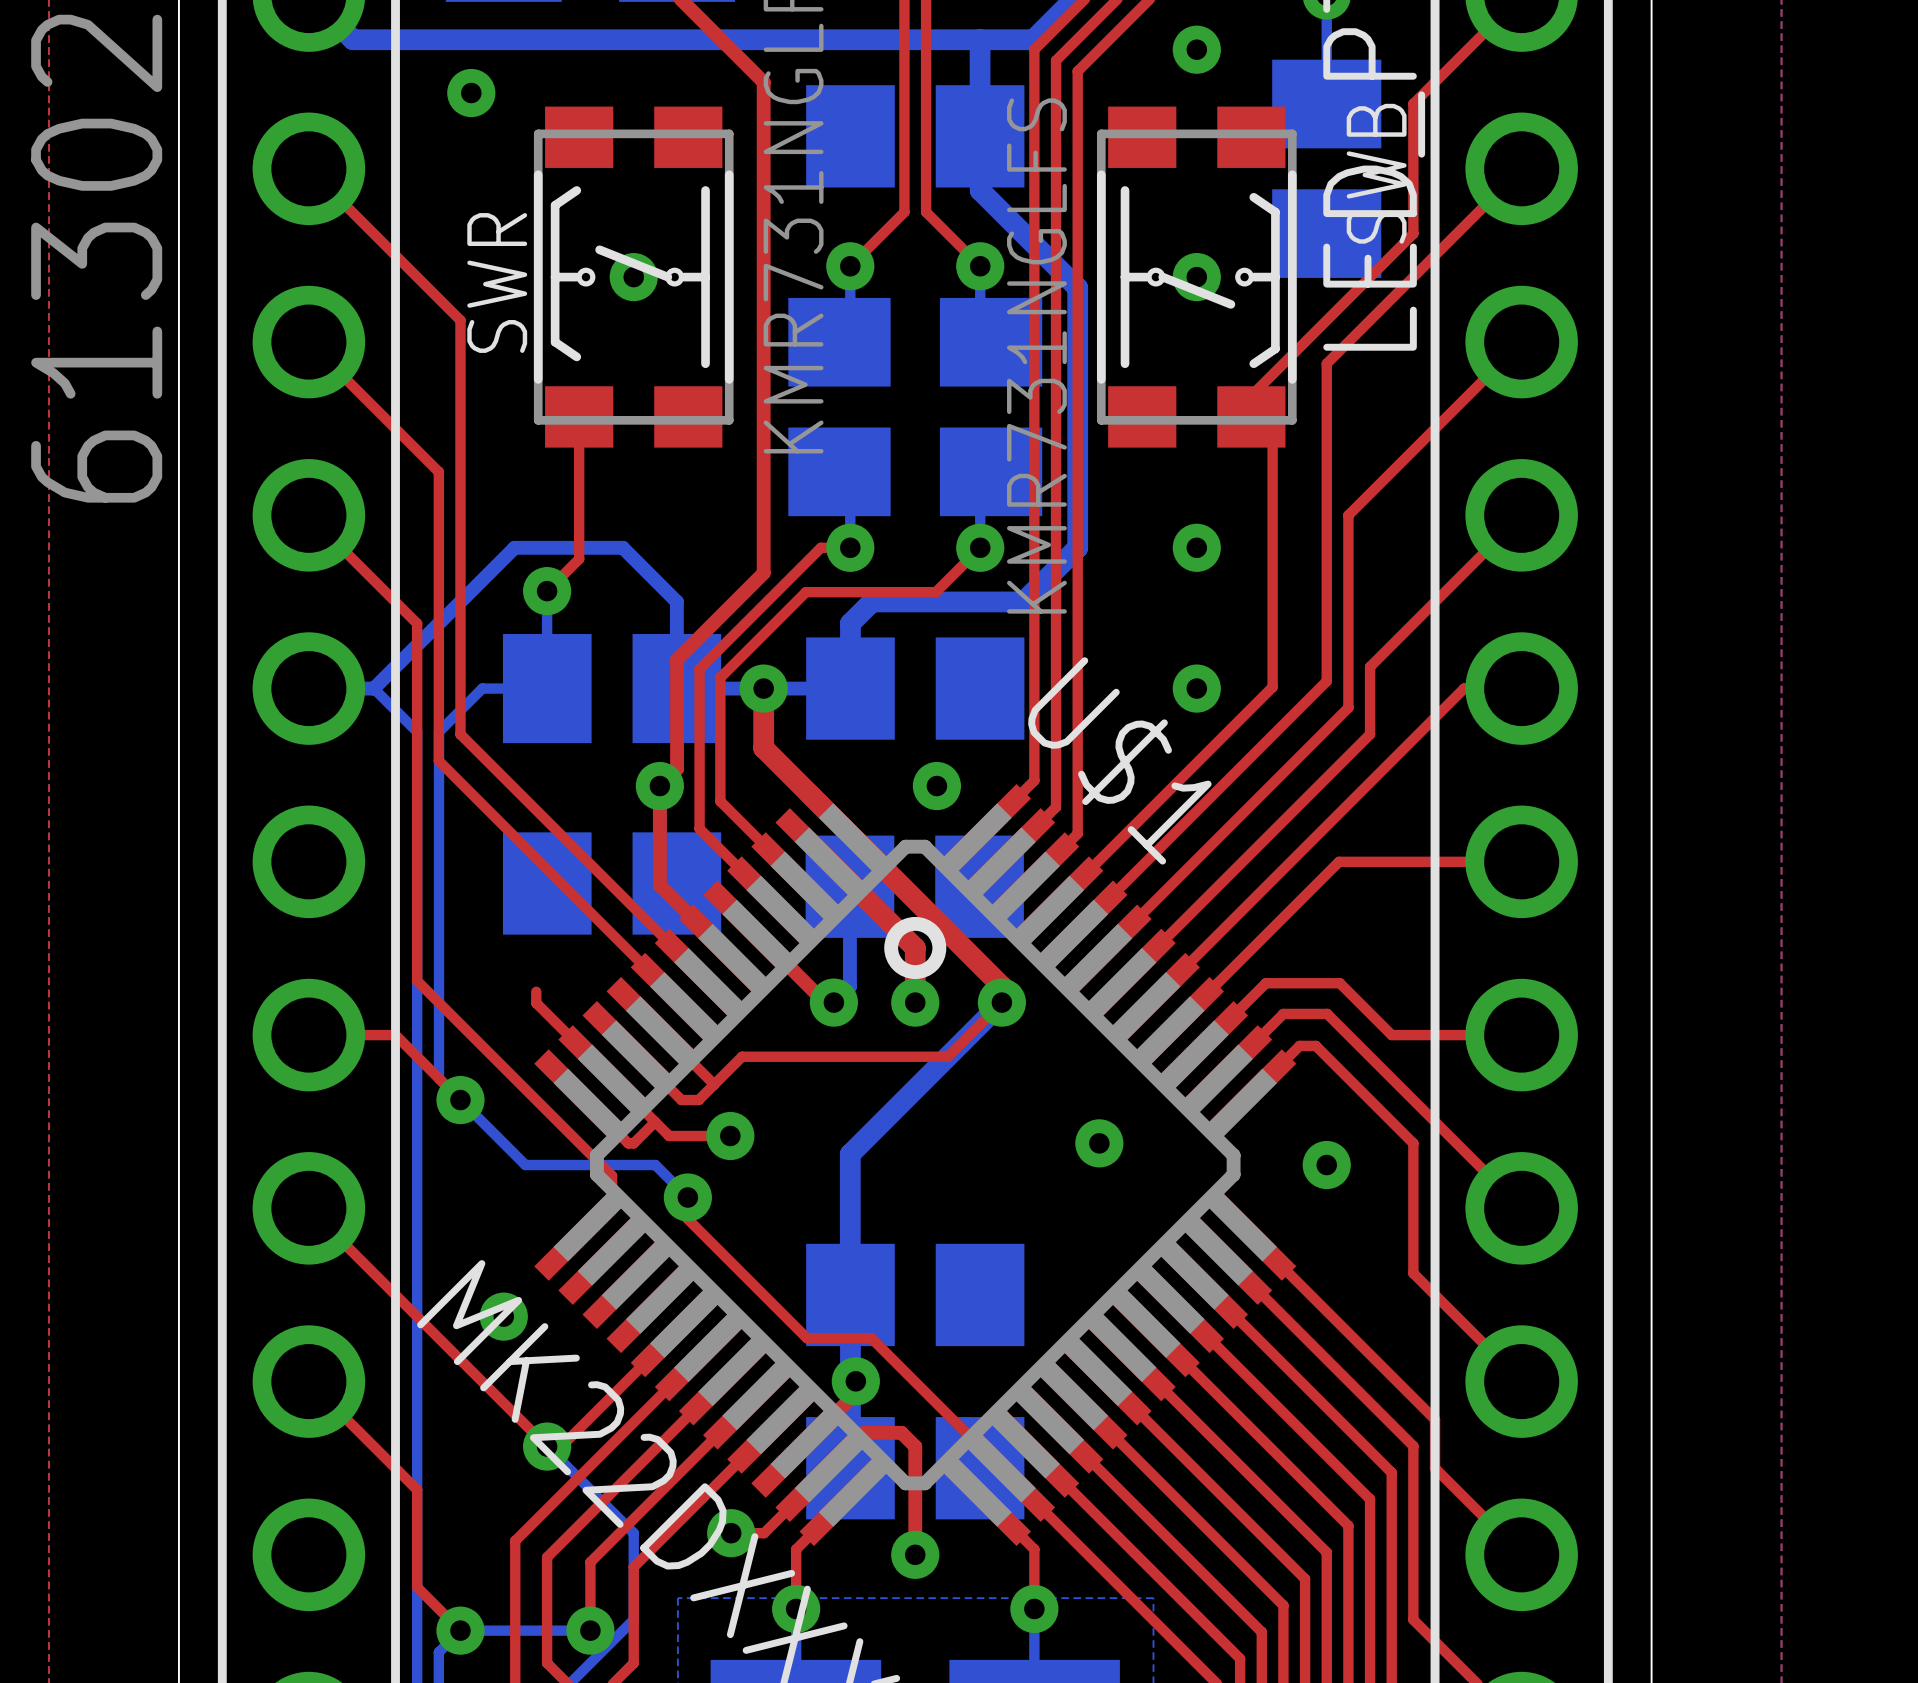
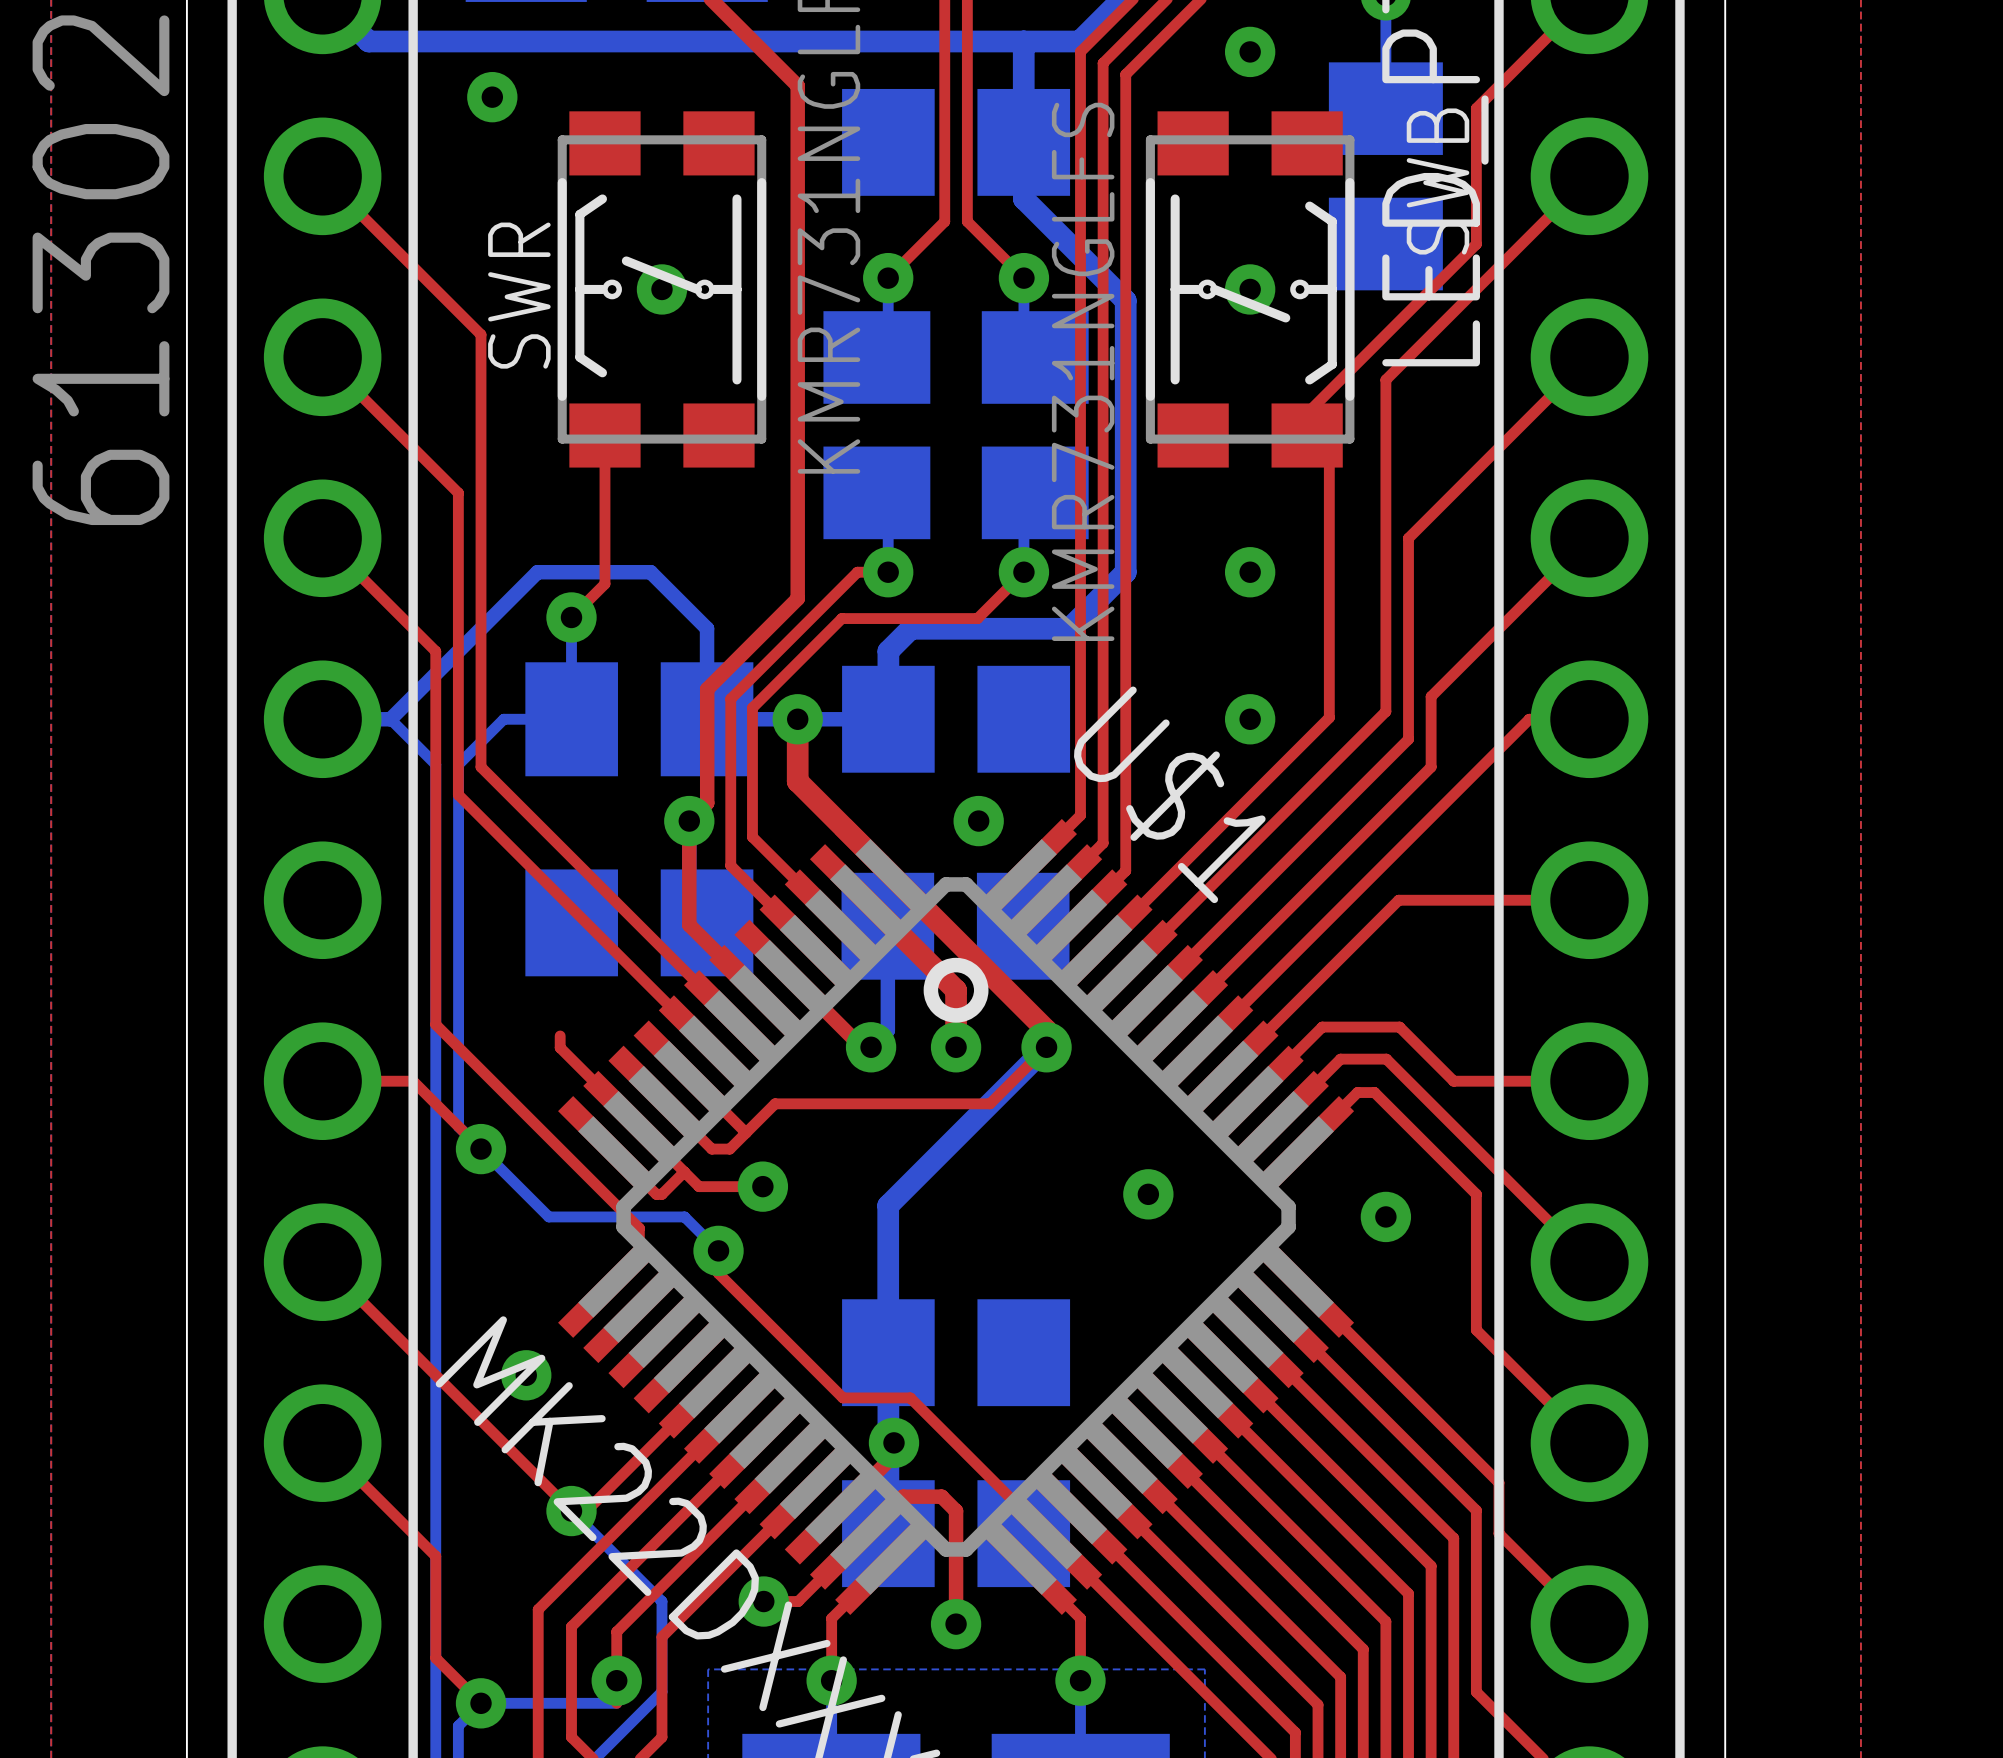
via position: (590, 1630) -> (616, 1680)

